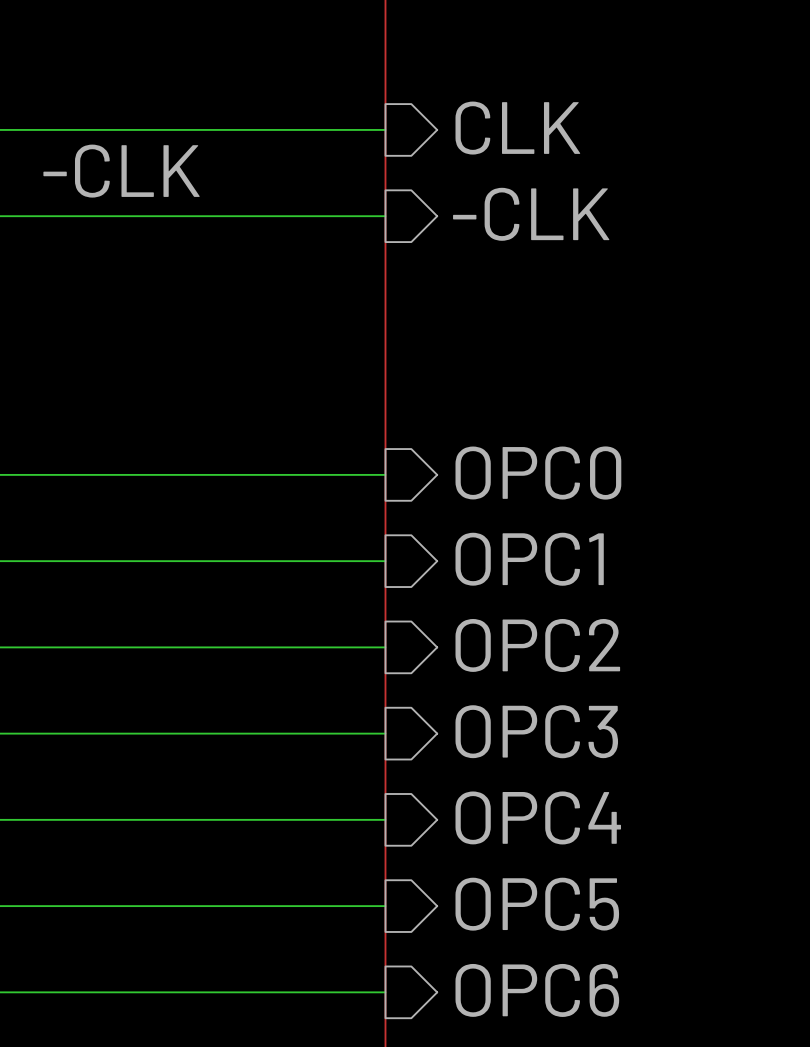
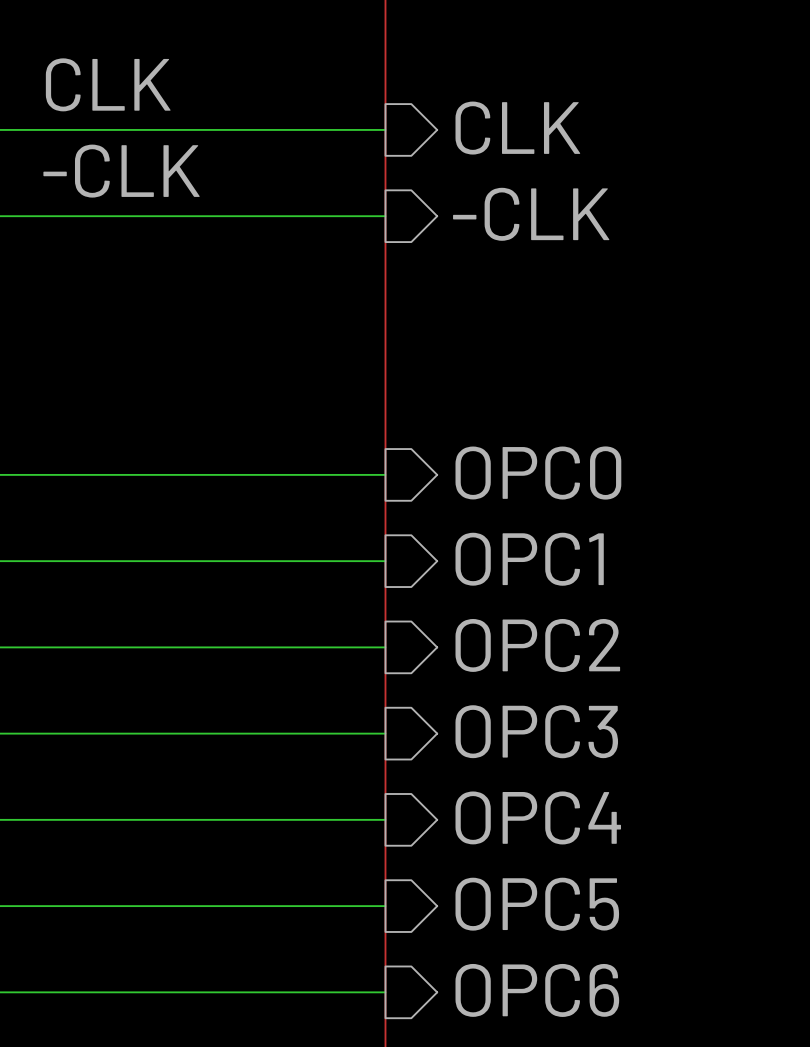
label: none -> CLK (108, 84)

